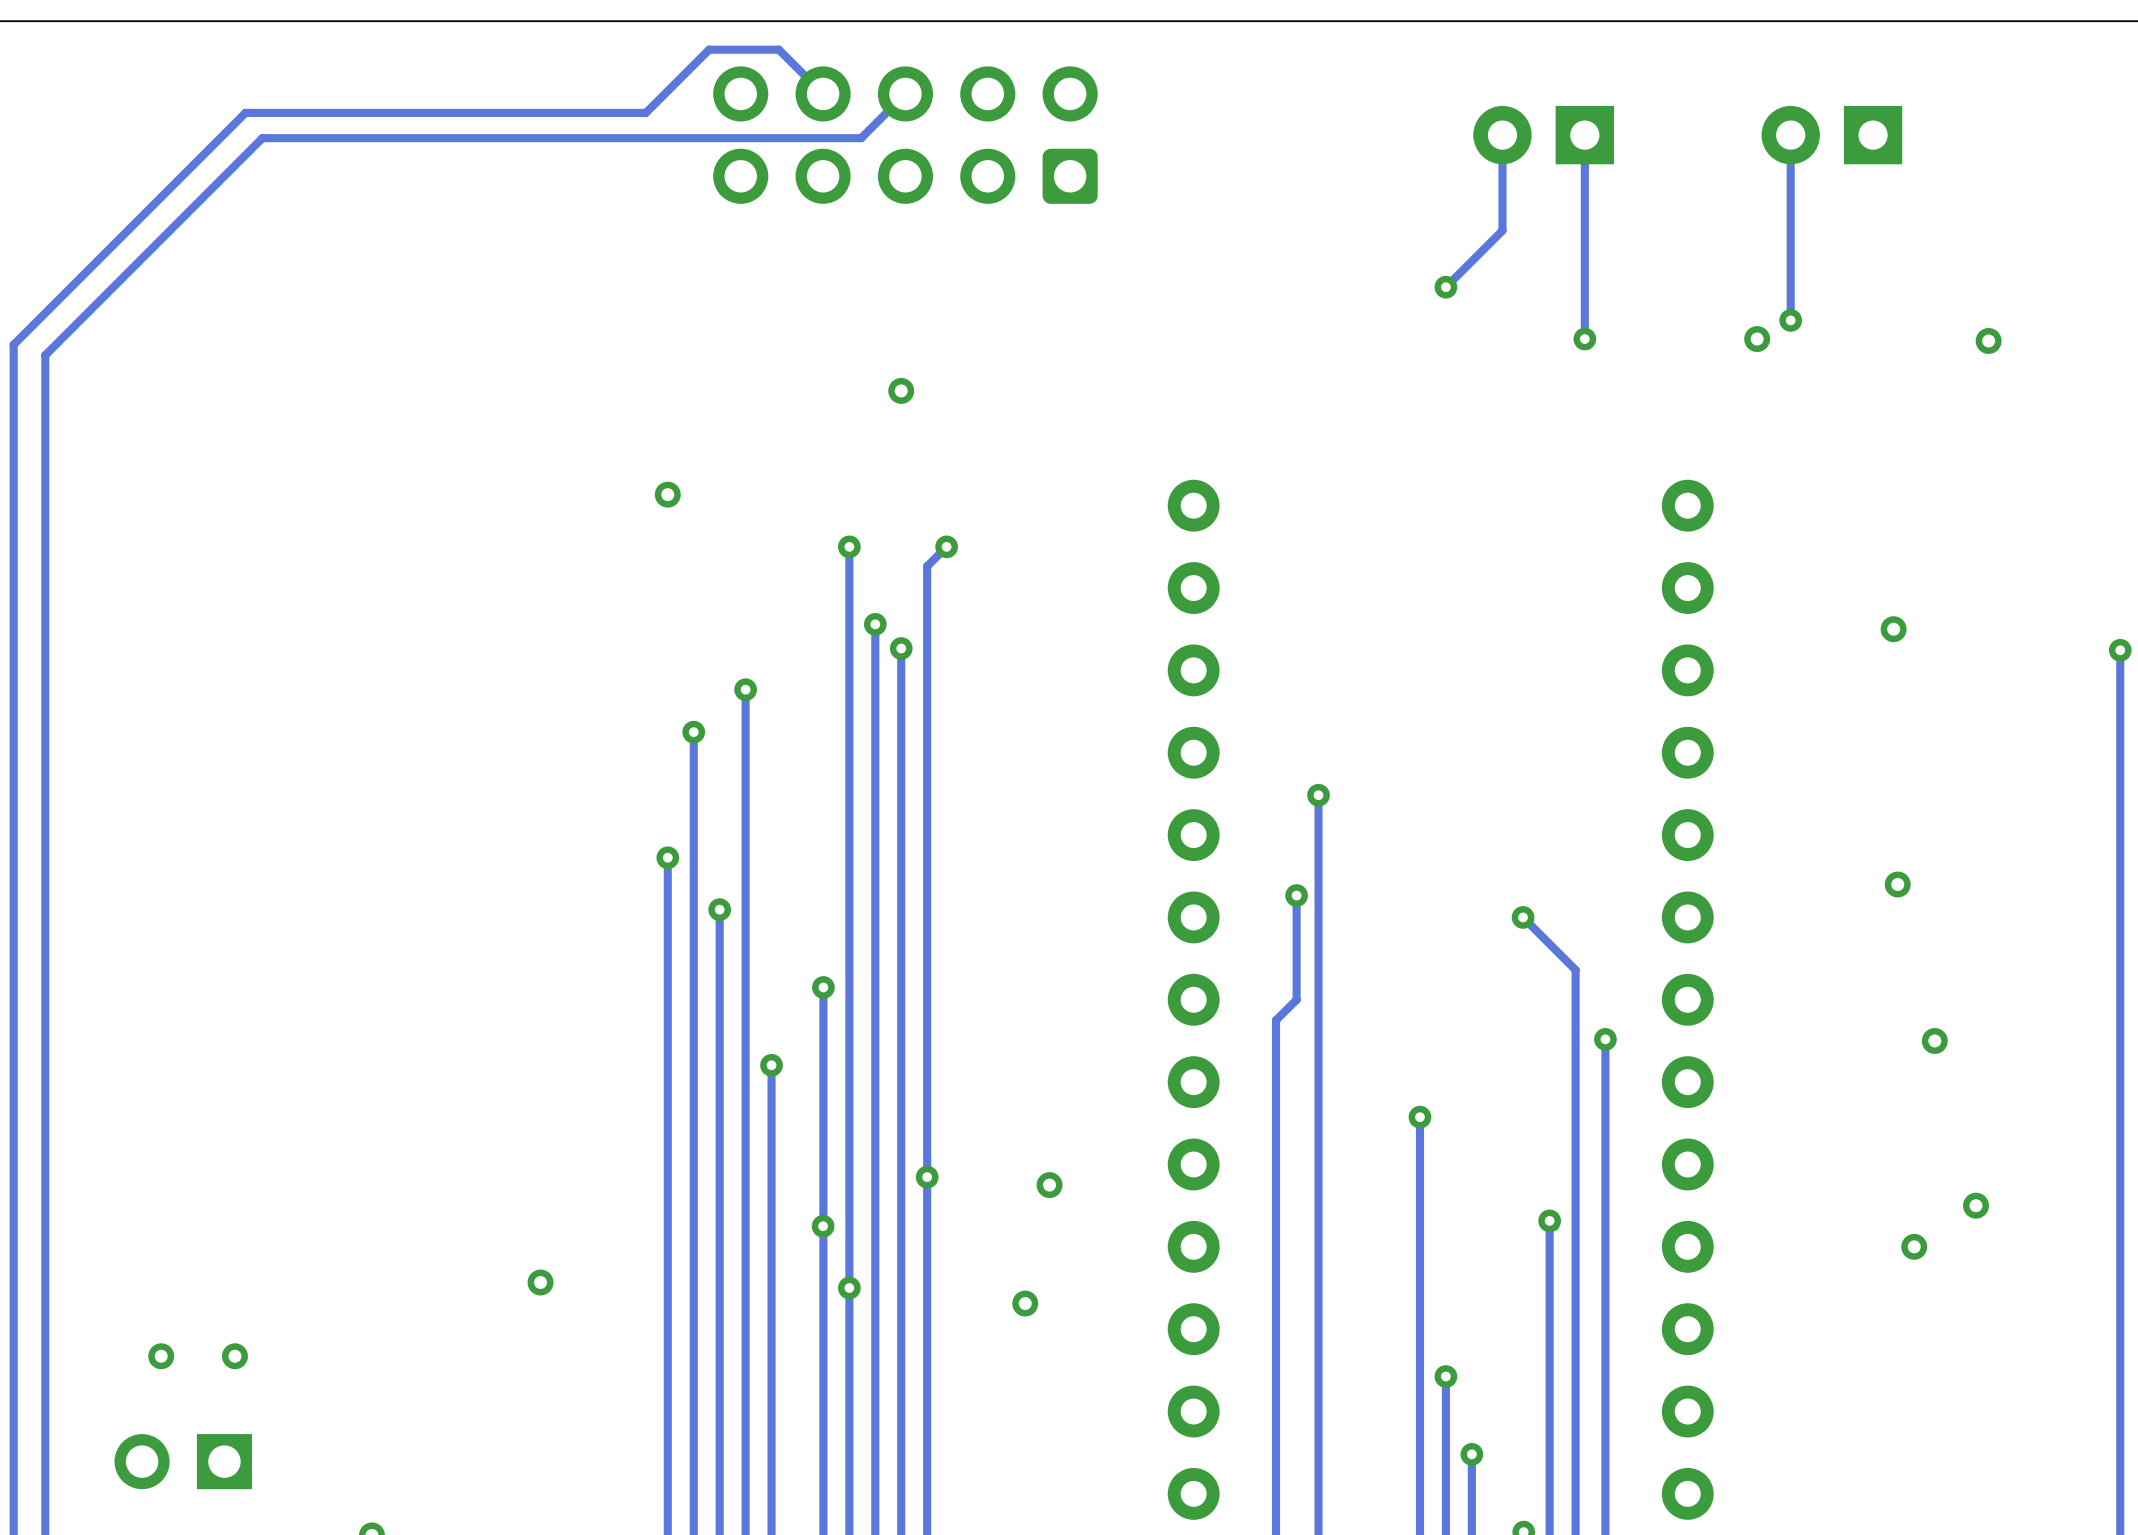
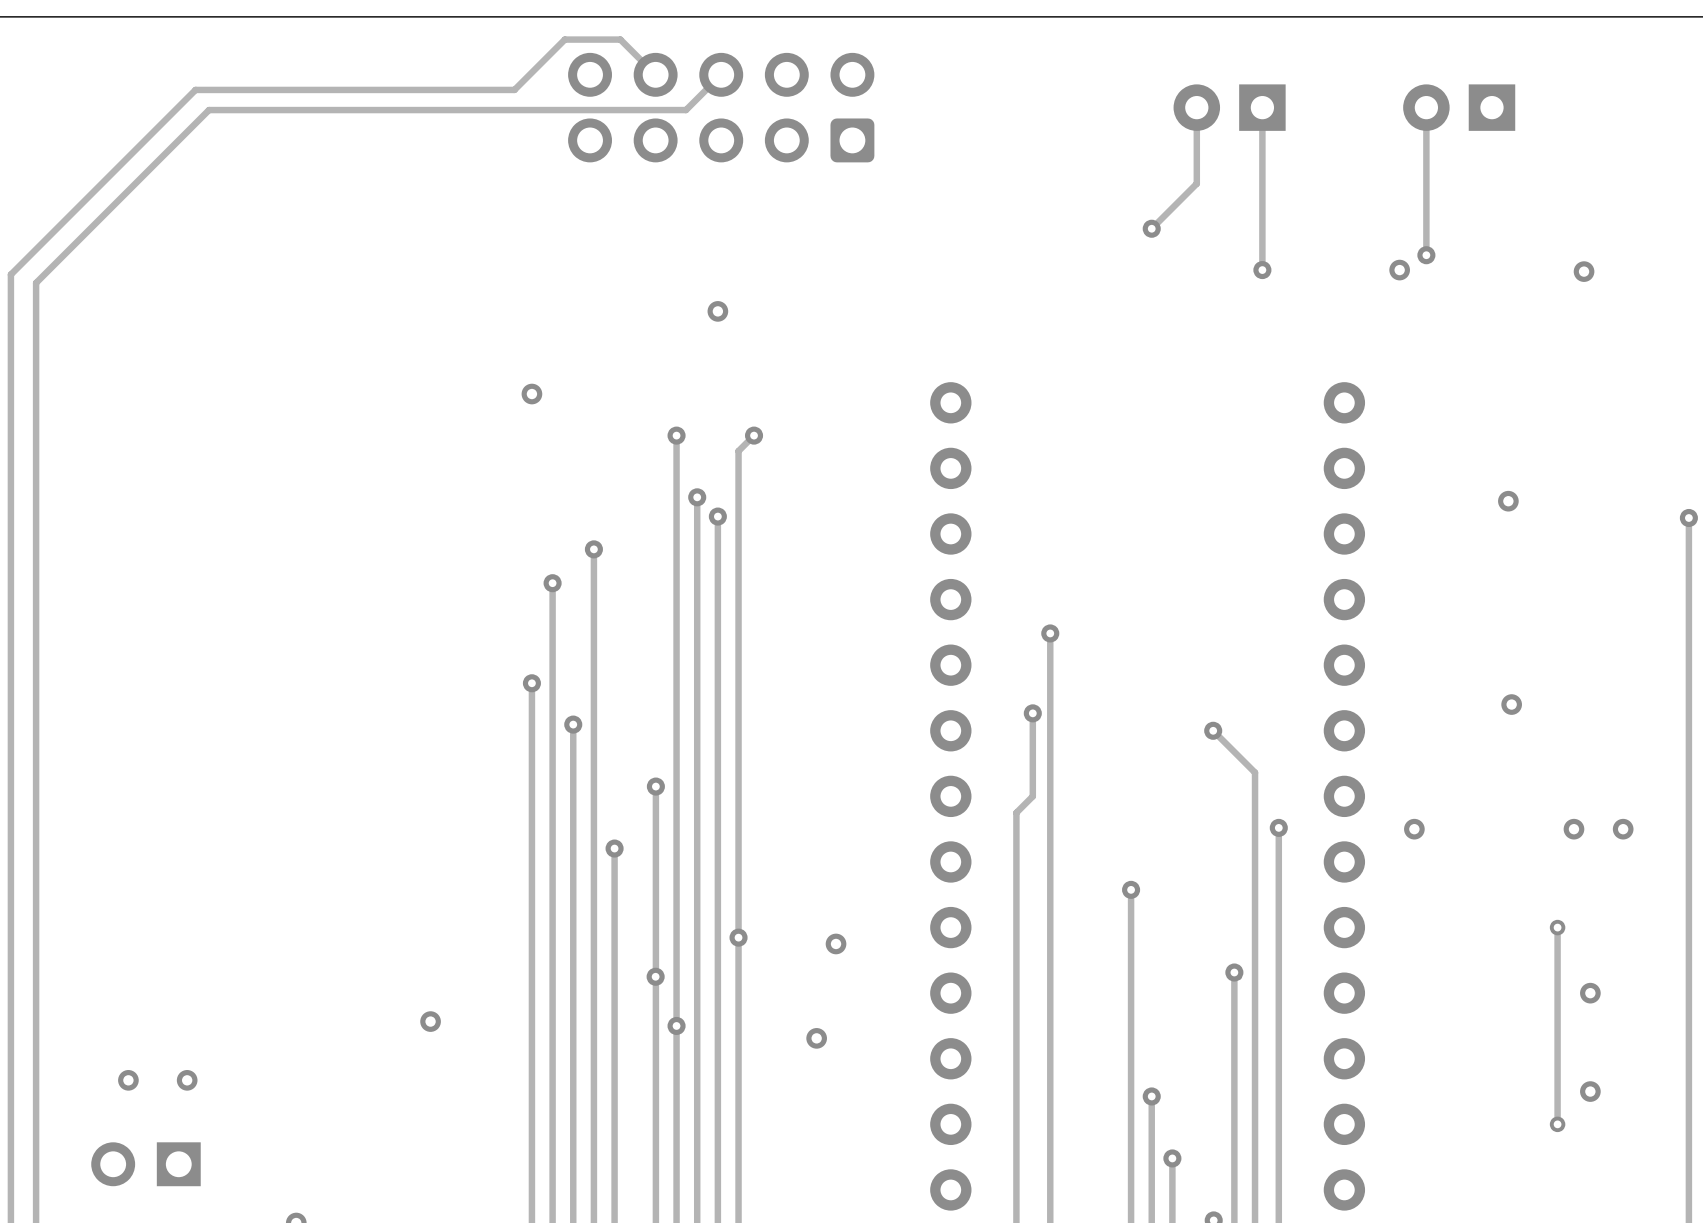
via: none -> (1414, 829)
via position: (1934, 1040) -> (1573, 829)
via: none -> (1623, 829)
track: none -> (1557, 927) (1557, 1124)
via: none -> (1557, 927)
via: (1975, 1205) -> none
via: (1914, 1246) -> none
via: none -> (1590, 993)
via: none -> (1590, 1091)
via: none -> (1557, 1124)

